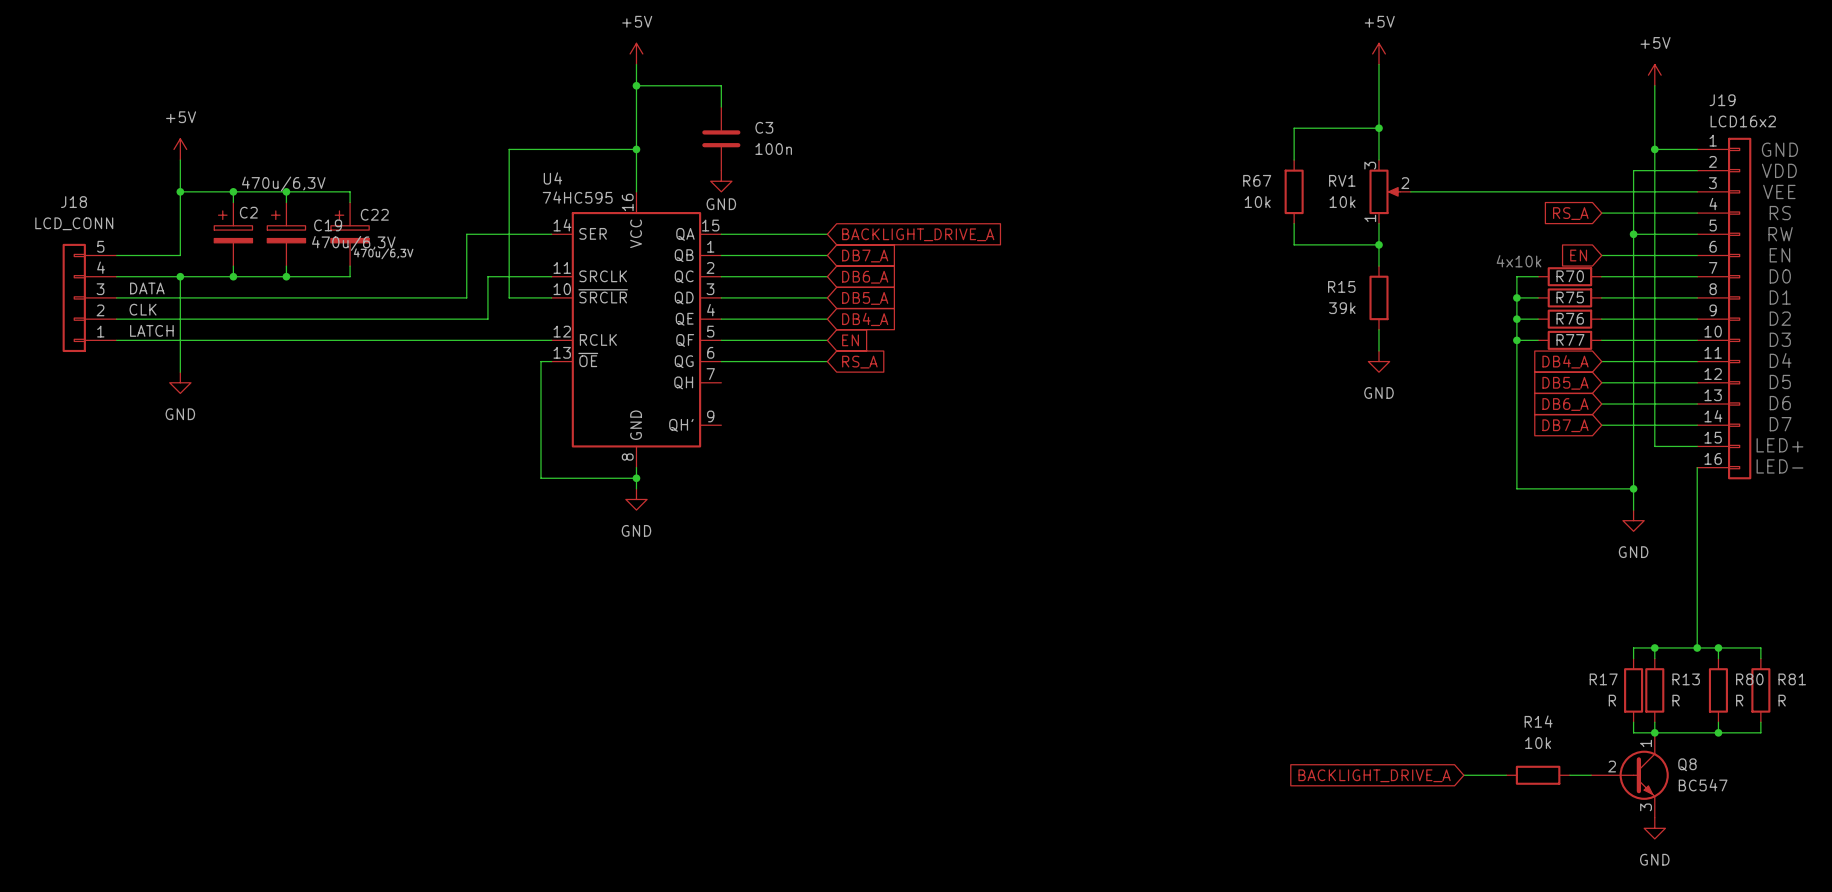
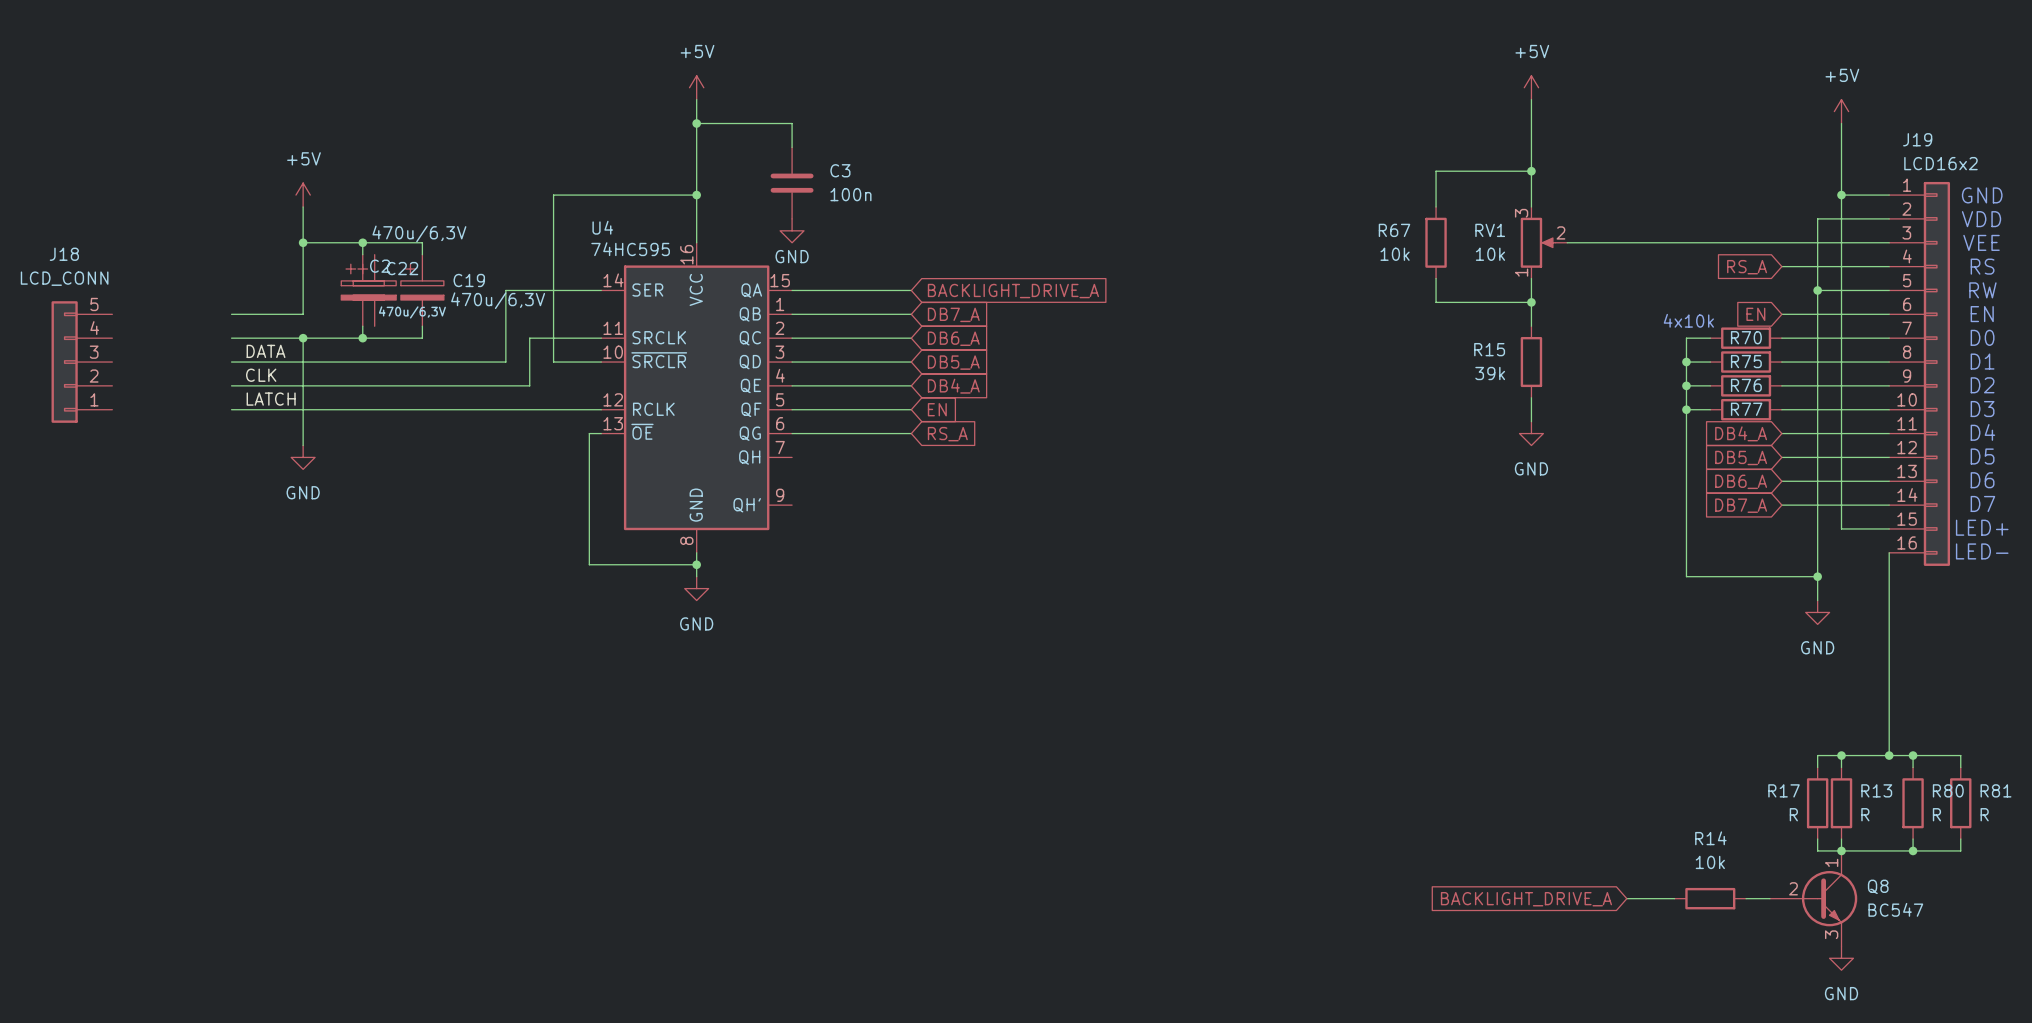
power symbol position: +5V (180, 149) -> +5V (303, 195)
wire: (180, 160) (180, 255) (116, 255) -> none
wire: (180, 191) (286, 191) -> (303, 206) (303, 242)
junction: (180, 191) -> none
wire: (233, 191) (233, 202) -> (362, 242) (362, 254)
junction: (233, 191) -> none
junction: none -> (362, 242)
wire: (350, 191) (350, 202) -> (374, 242) (422, 242) (422, 254)
wire: none -> (303, 254) (303, 314) (231, 314)
C2 position: (233, 234) -> (362, 290)
C19 position: (286, 234) -> (422, 290)
wire: (233, 266) (233, 276) -> (362, 326) (362, 338)
wire: (286, 266) (286, 276) -> (303, 445) (303, 338)
wire: (350, 266) (350, 276) -> (422, 326) (422, 338) (374, 338)
wire: (116, 276) (222, 276) -> none
wire: (180, 276) (180, 372) -> none
junction: (180, 276) -> none
junction: (233, 276) -> none
junction: none -> (362, 338)
label position: DATA (147, 288) -> DATA (266, 351)
wire: (116, 297) (222, 297) -> none
label position: CLK (143, 309) -> CLK (261, 375)
wire: (116, 319) (222, 319) -> none
label position: LATCH (151, 330) -> LATCH (271, 399)
wire: (116, 340) (222, 340) -> none
power symbol position: GND (180, 382) -> GND (303, 457)

